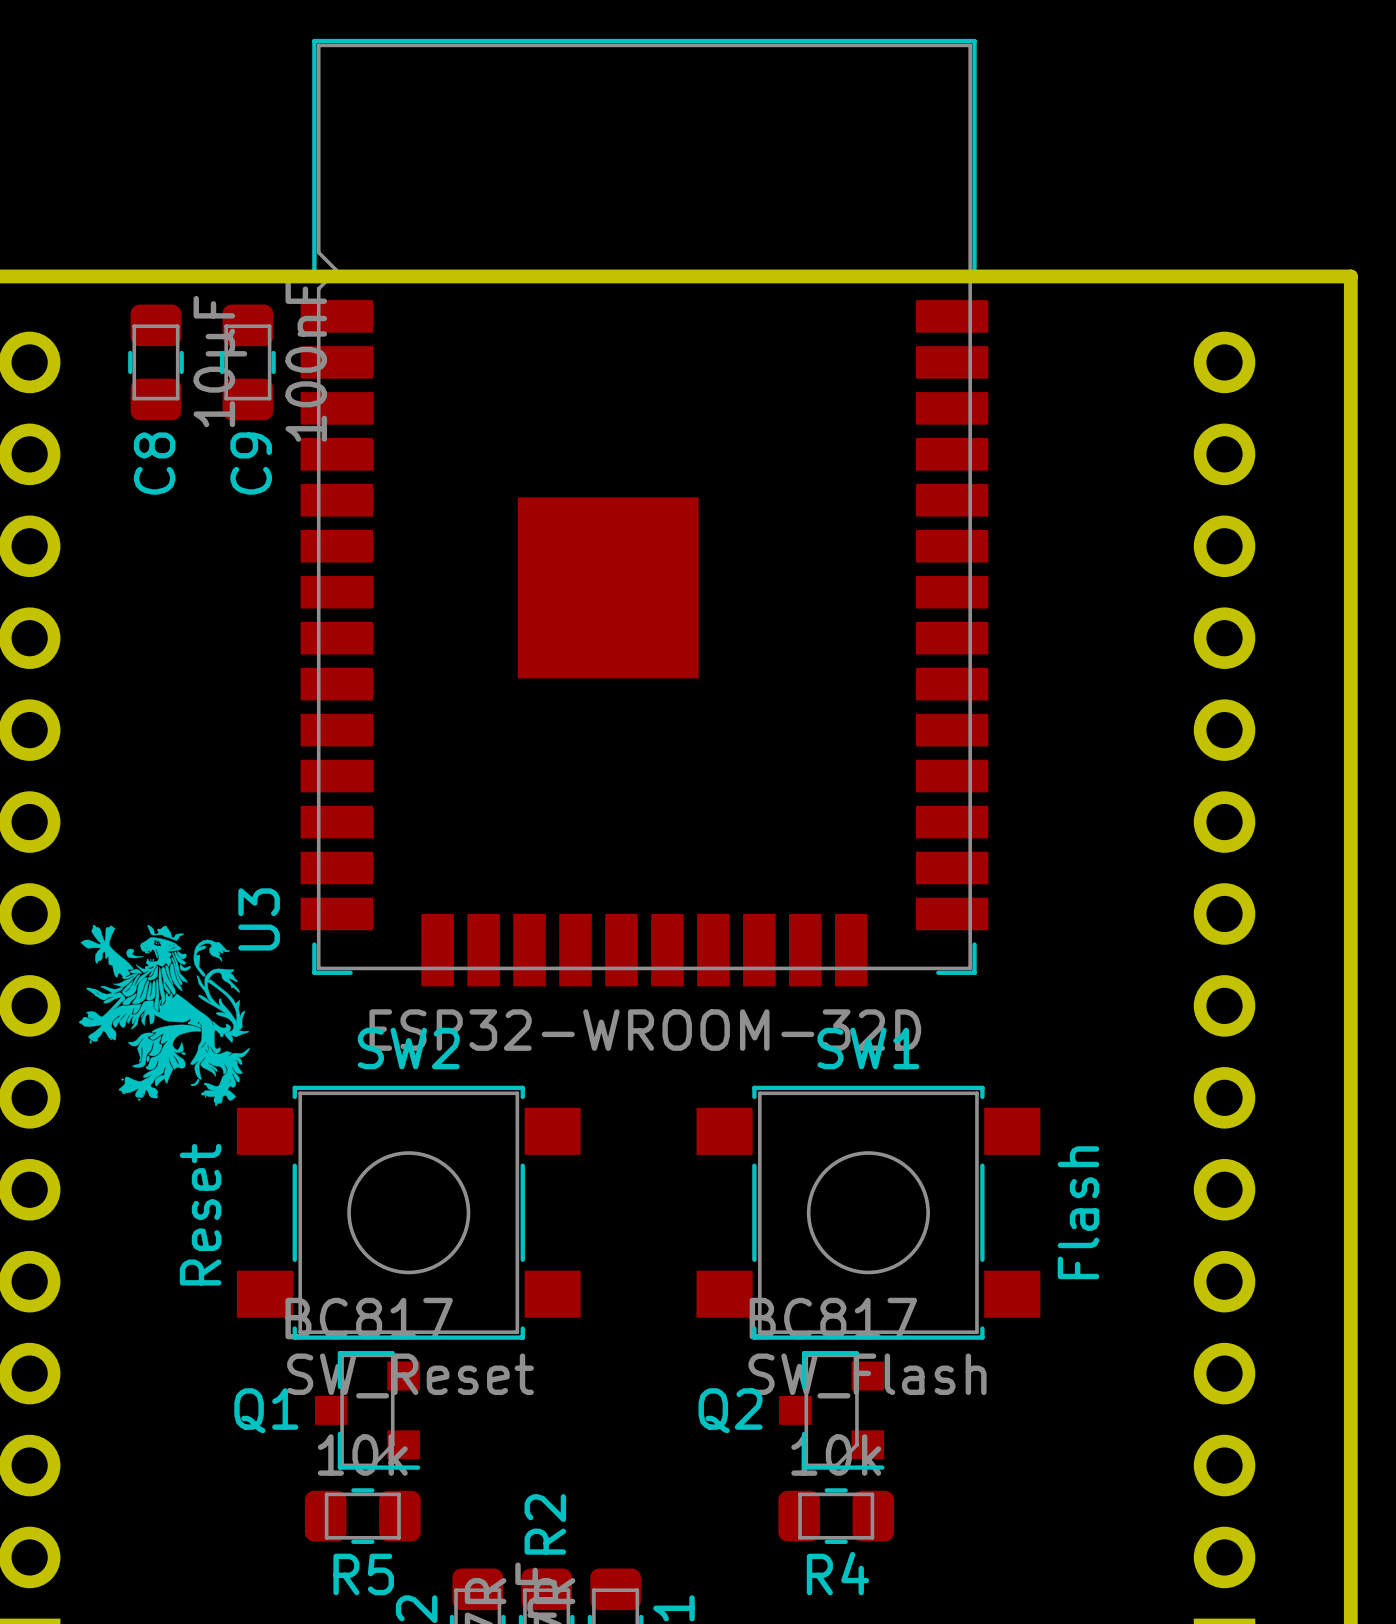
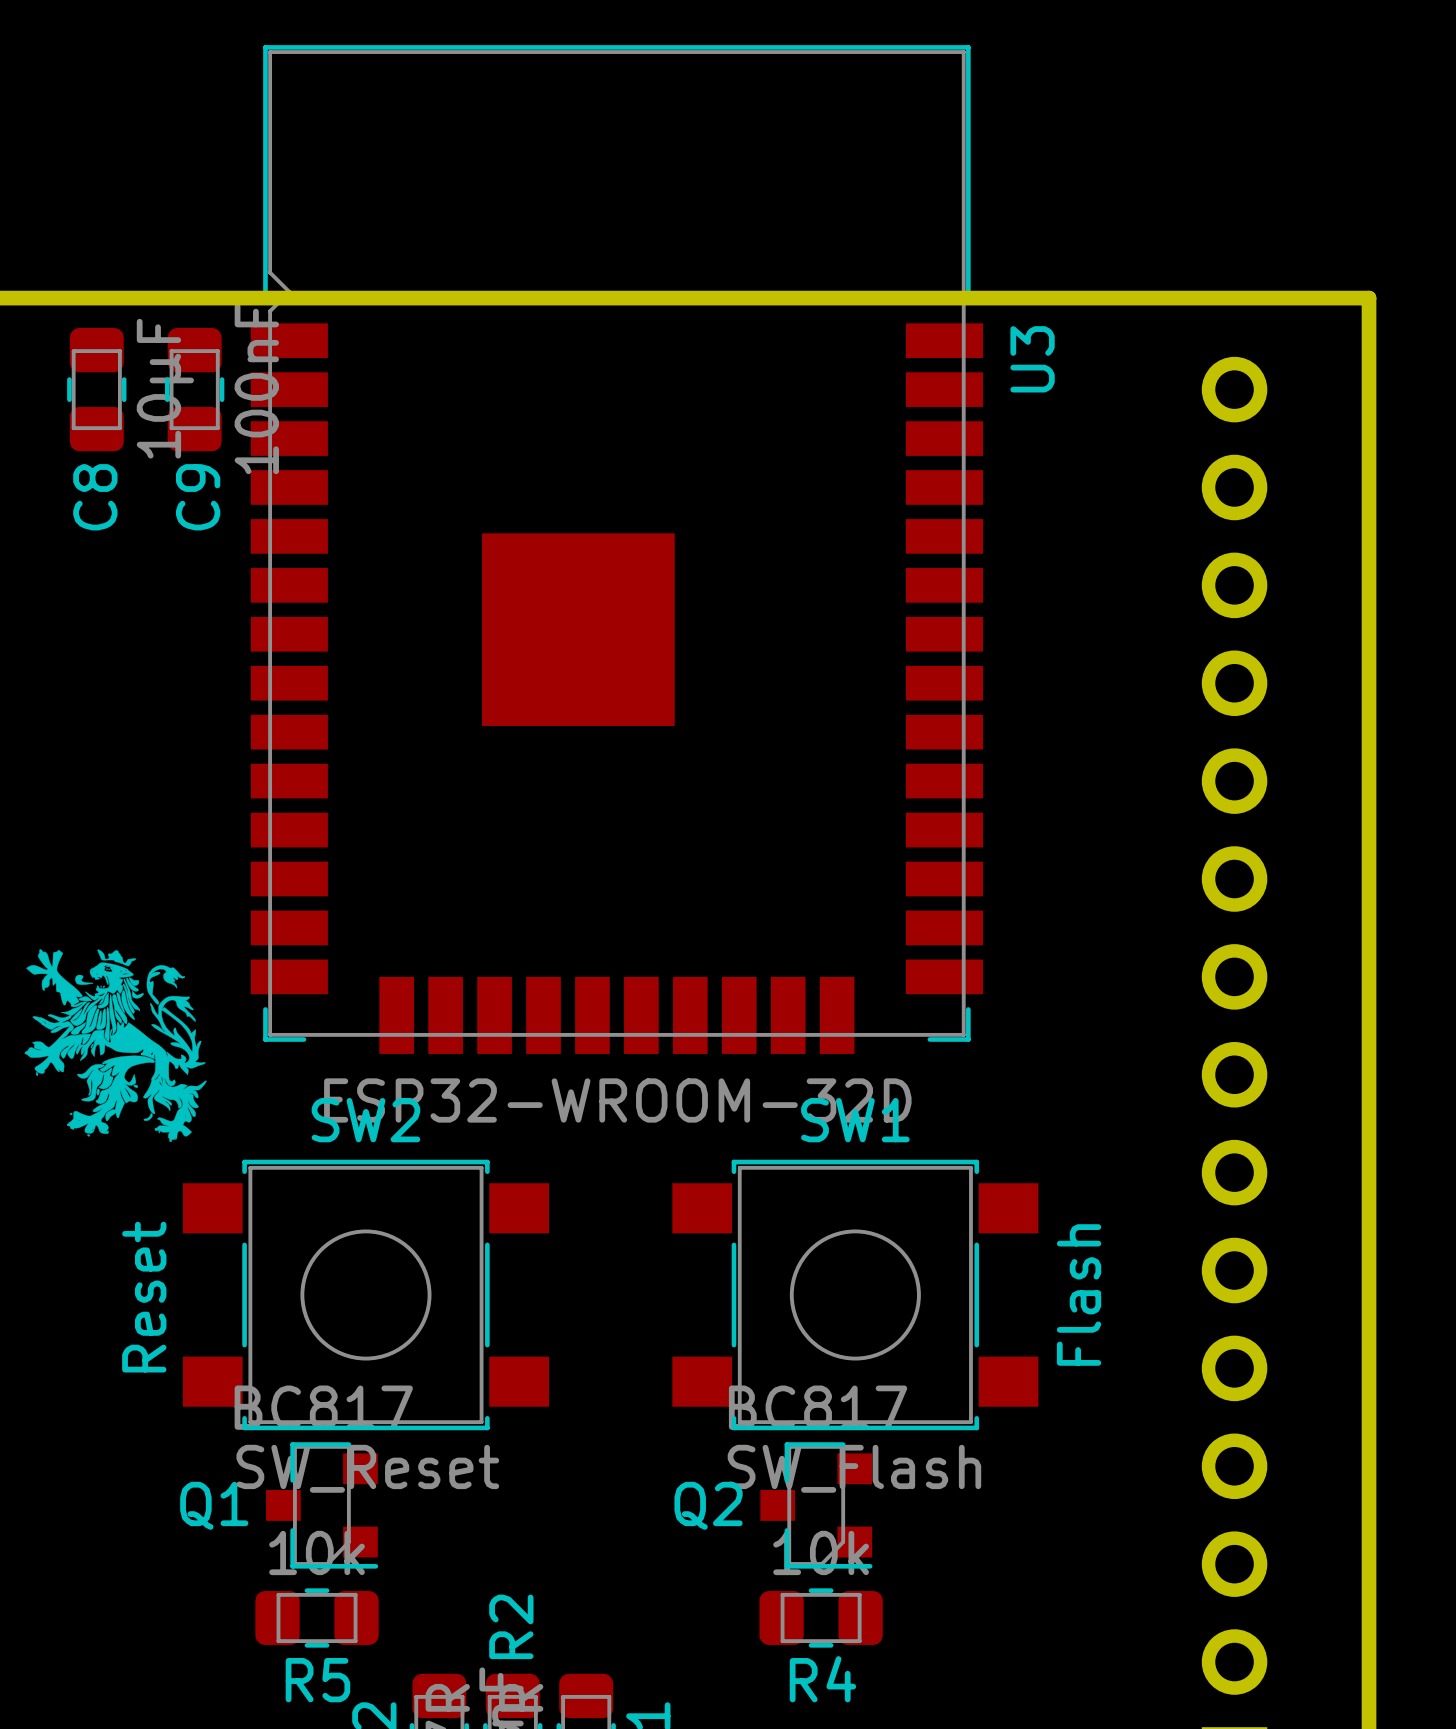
U3 name position: U3 (259, 919) -> U3 (1032, 359)
drawing position: (164, 1015) -> (115, 1045)

